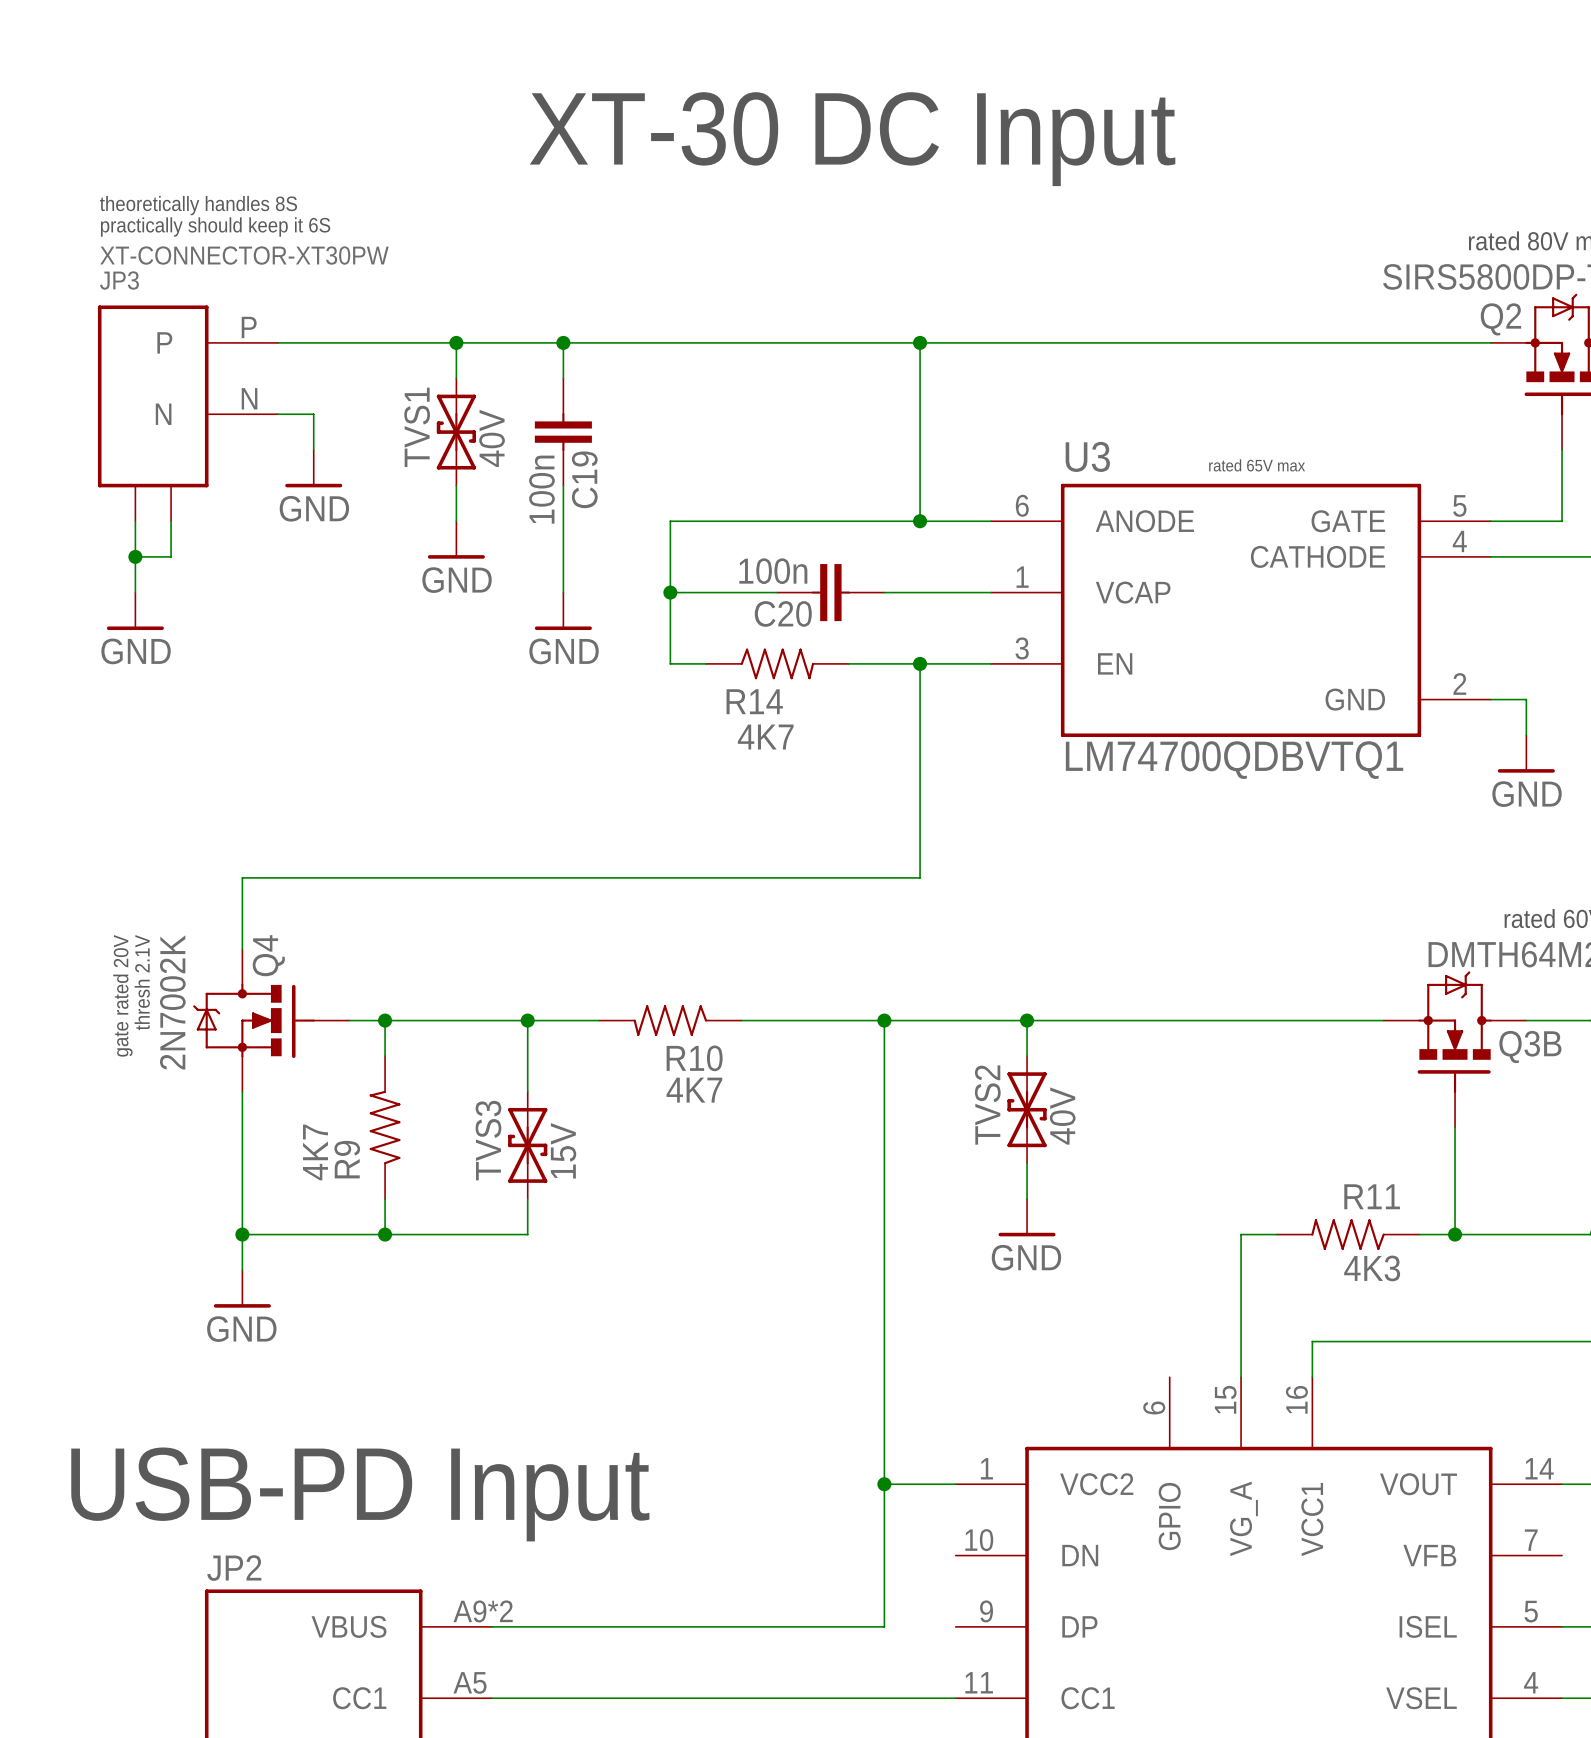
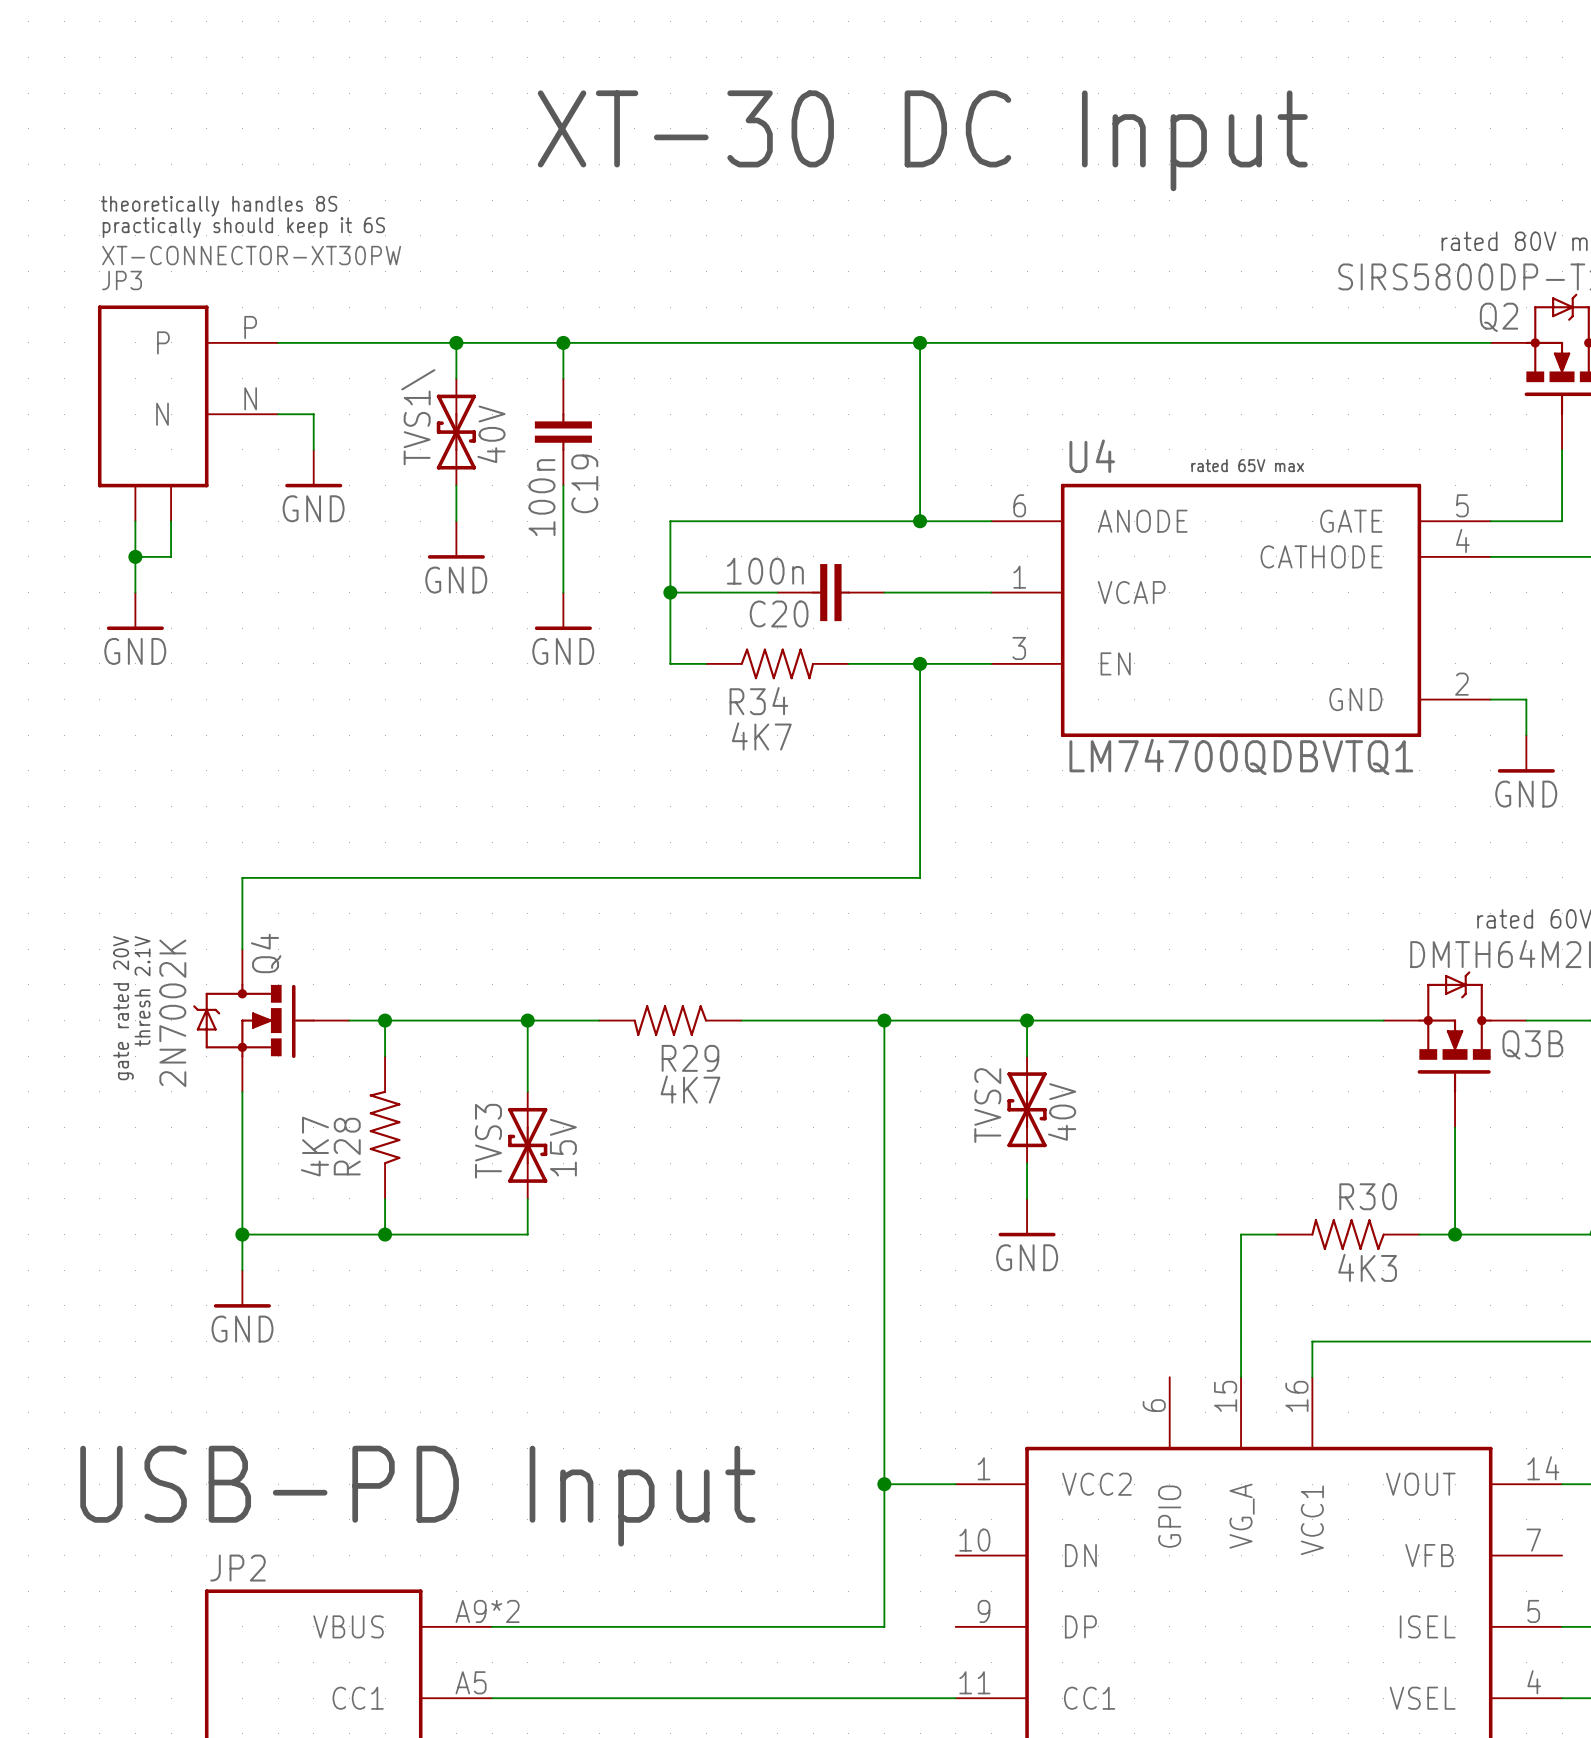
TVS1 name: TVS1 (417, 427) -> TVS1\ (418, 417)
U3 name: U3 (1087, 456) -> U4 (1092, 456)
R14 name: R14 (754, 701) -> R34 (758, 701)
R10 name: R10 (694, 1058) -> R29 (690, 1058)
R9 name: R9 (347, 1159) -> R28 (347, 1146)
R11 name: R11 (1372, 1196) -> R30 (1368, 1196)

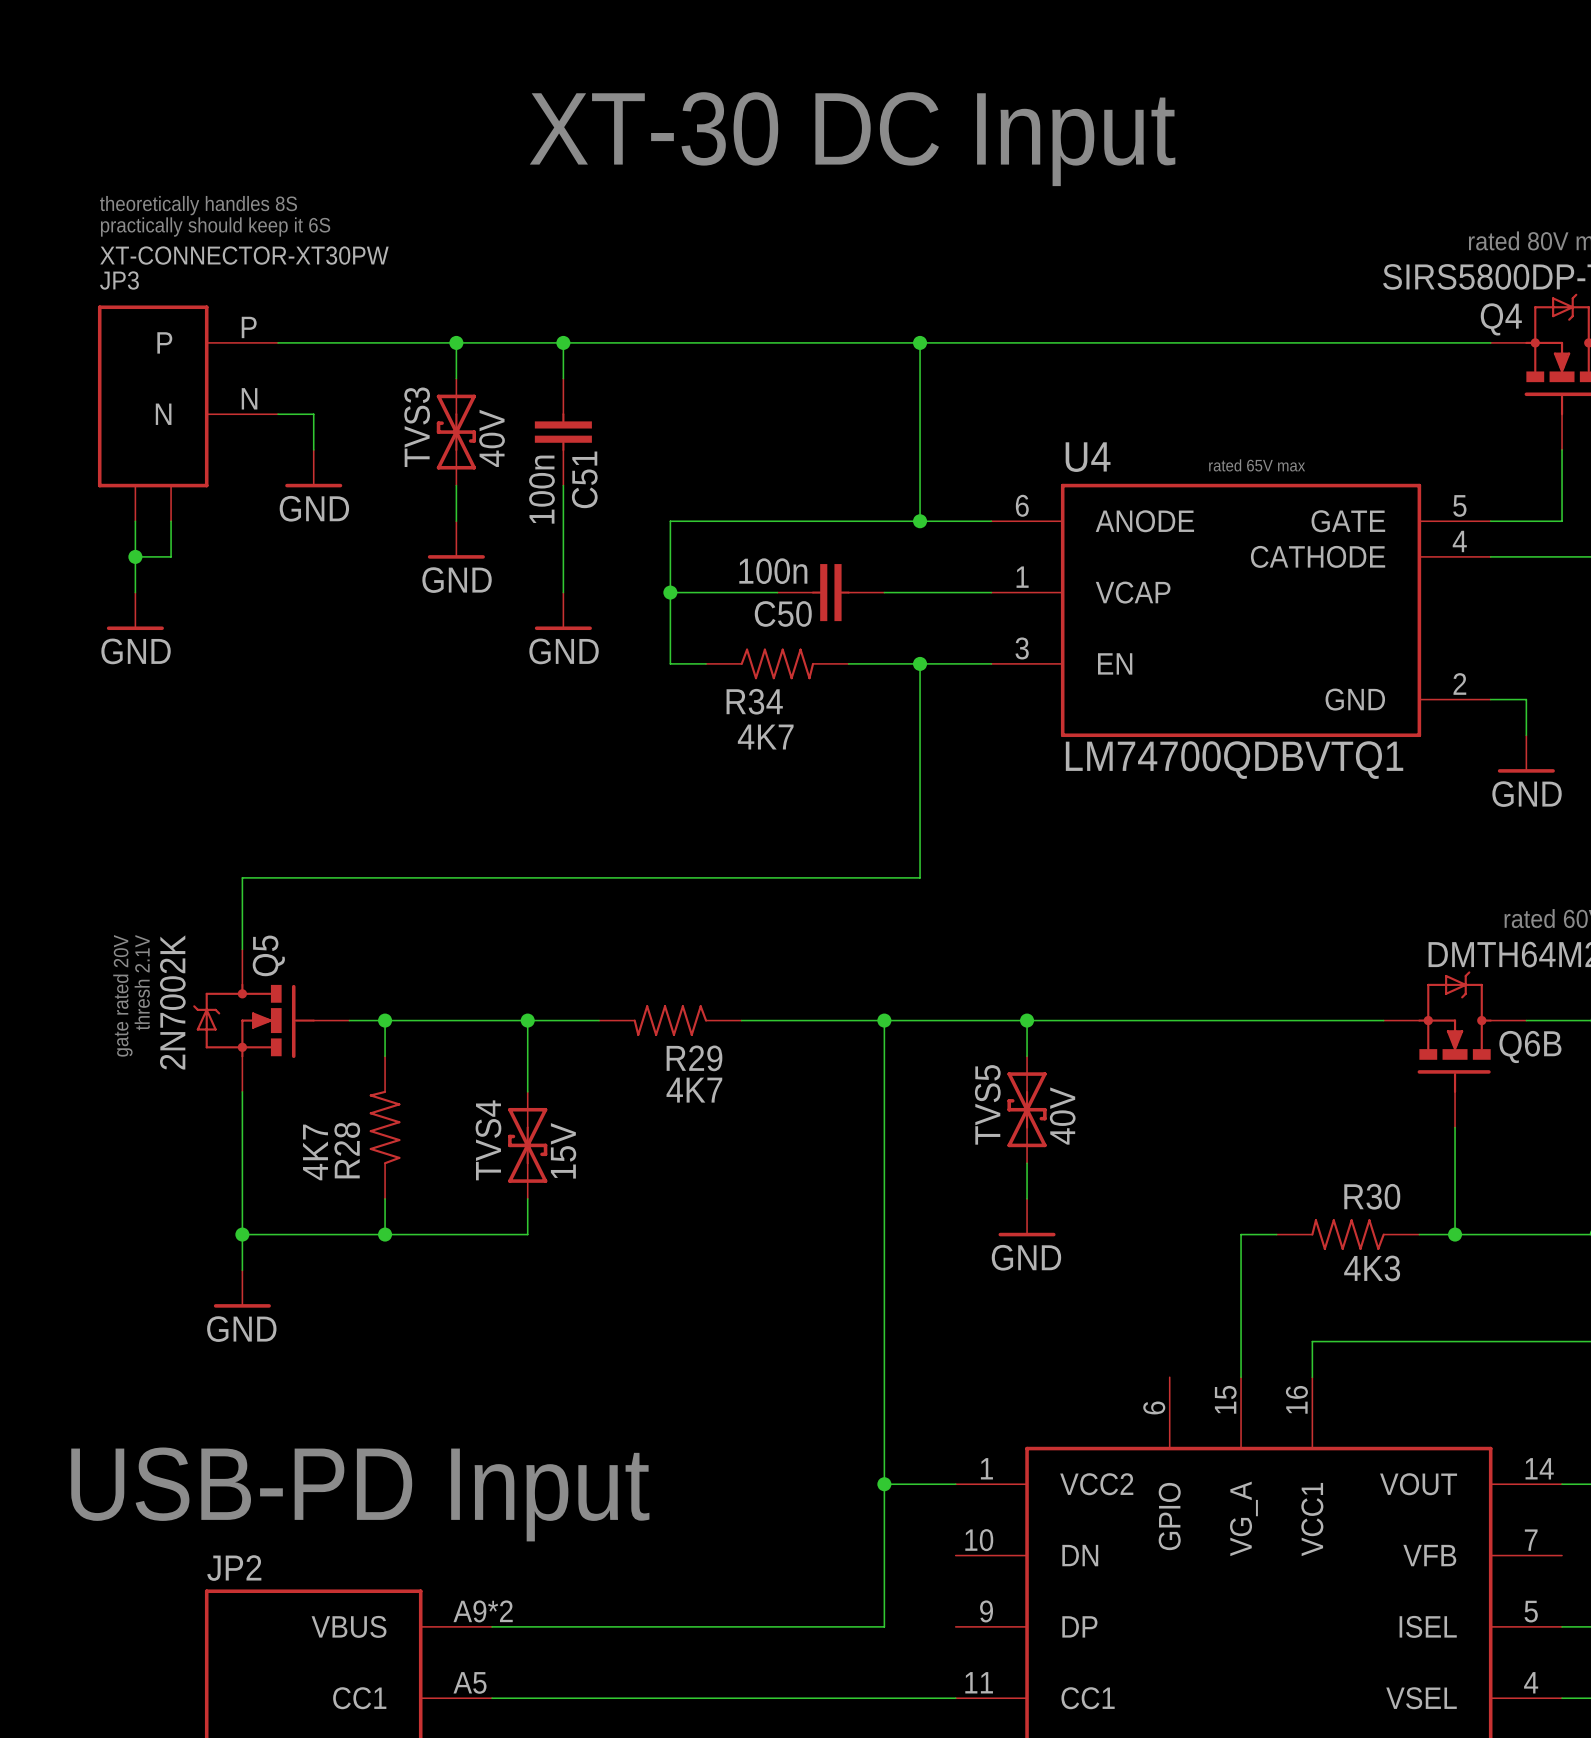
Q2 name: Q2 (1499, 317) -> Q4 (1501, 319)
TVS1\ name: TVS1\ (418, 417) -> TVS3 (417, 427)
C19 name: C19 (584, 483) -> C51 (584, 479)
C20 name: C20 (779, 613) -> C50 (783, 613)
Q4 name: Q4 (266, 953) -> Q5 (268, 955)
Q3B name: Q3B (1532, 1044) -> Q6B (1530, 1046)
TVS2 name: TVS2 (987, 1105) -> TVS5 (987, 1104)
TVS3 name: TVS3 (488, 1141) -> TVS4 (488, 1140)

